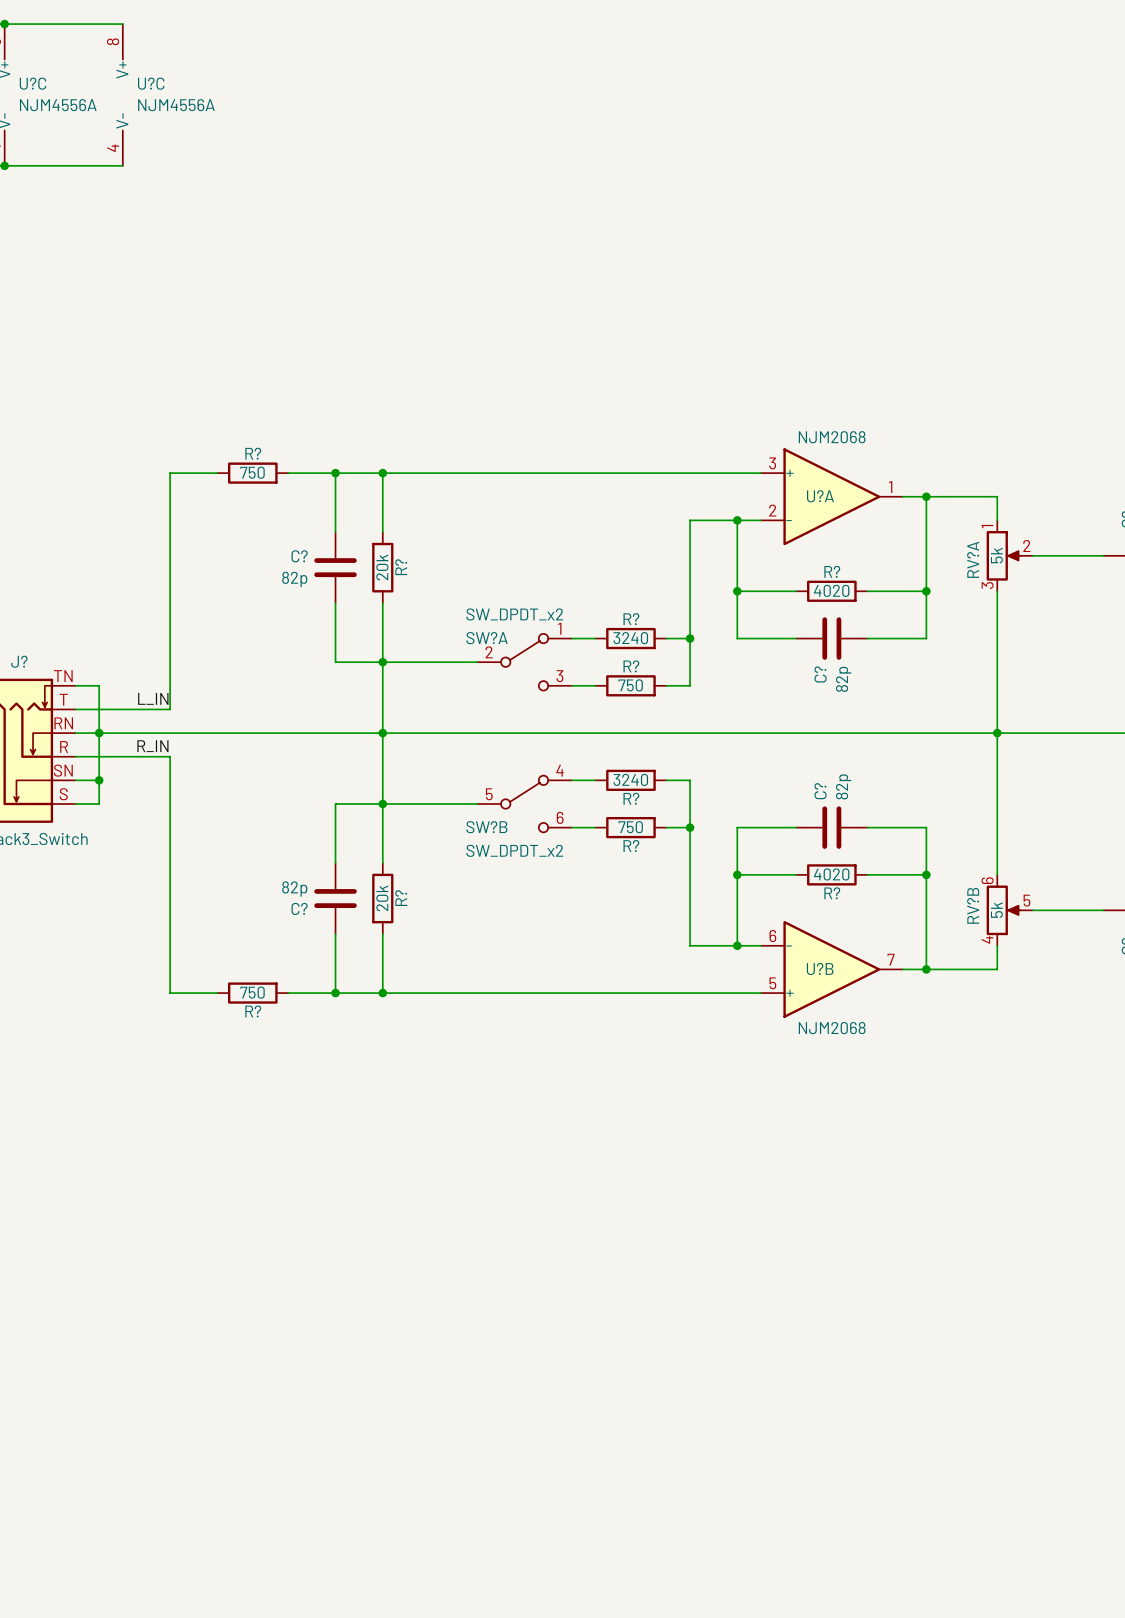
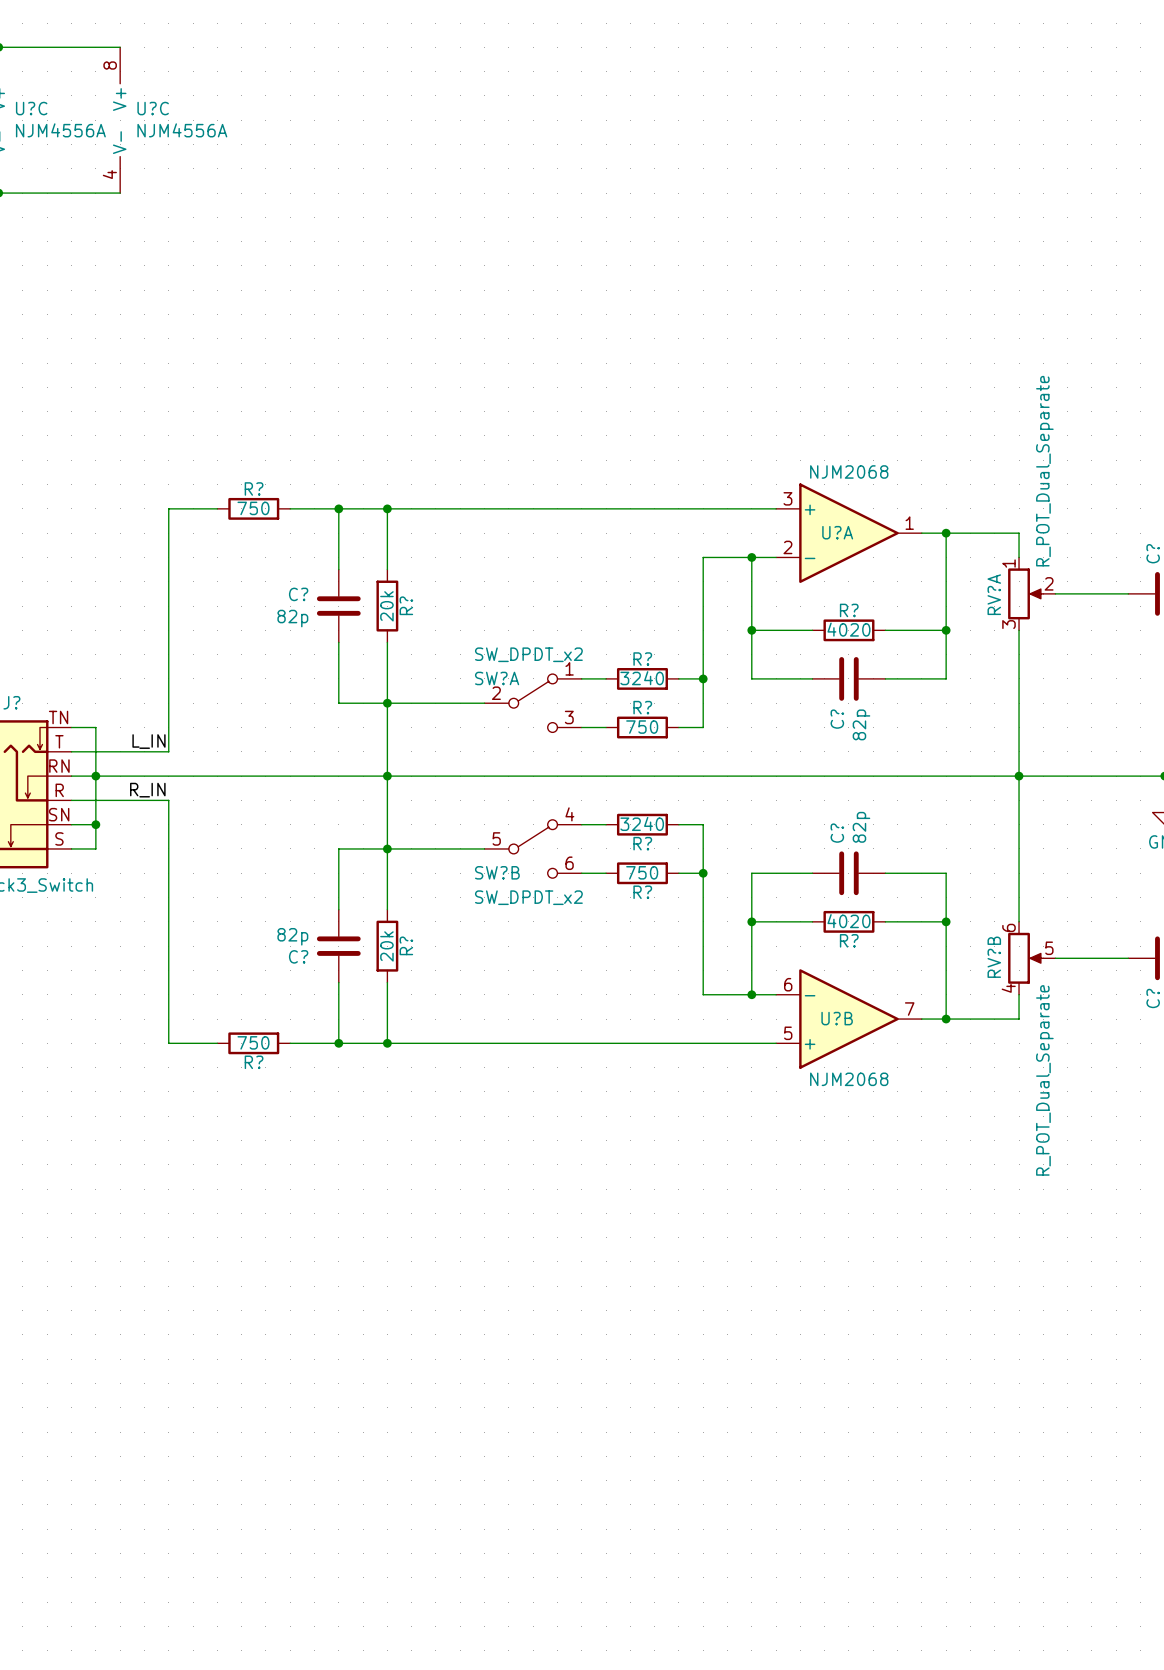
RV?A value: 5k (996, 555) -> R_POT_Dual_Separate (1044, 471)
RV?B value: 5k (996, 910) -> R_POT_Dual_Separate (1044, 1080)

